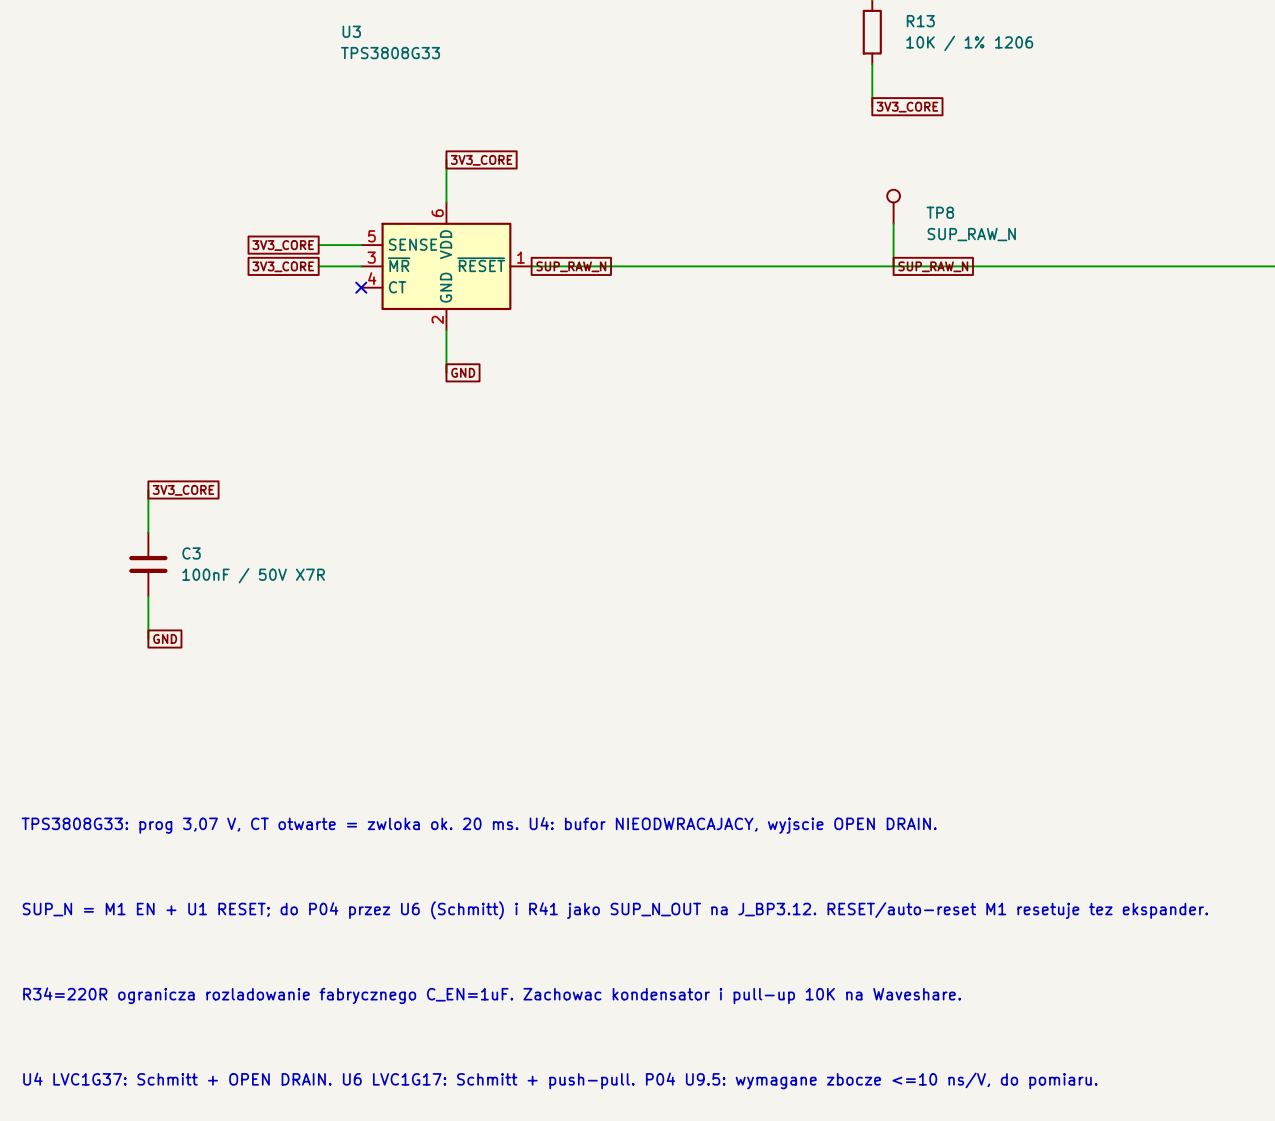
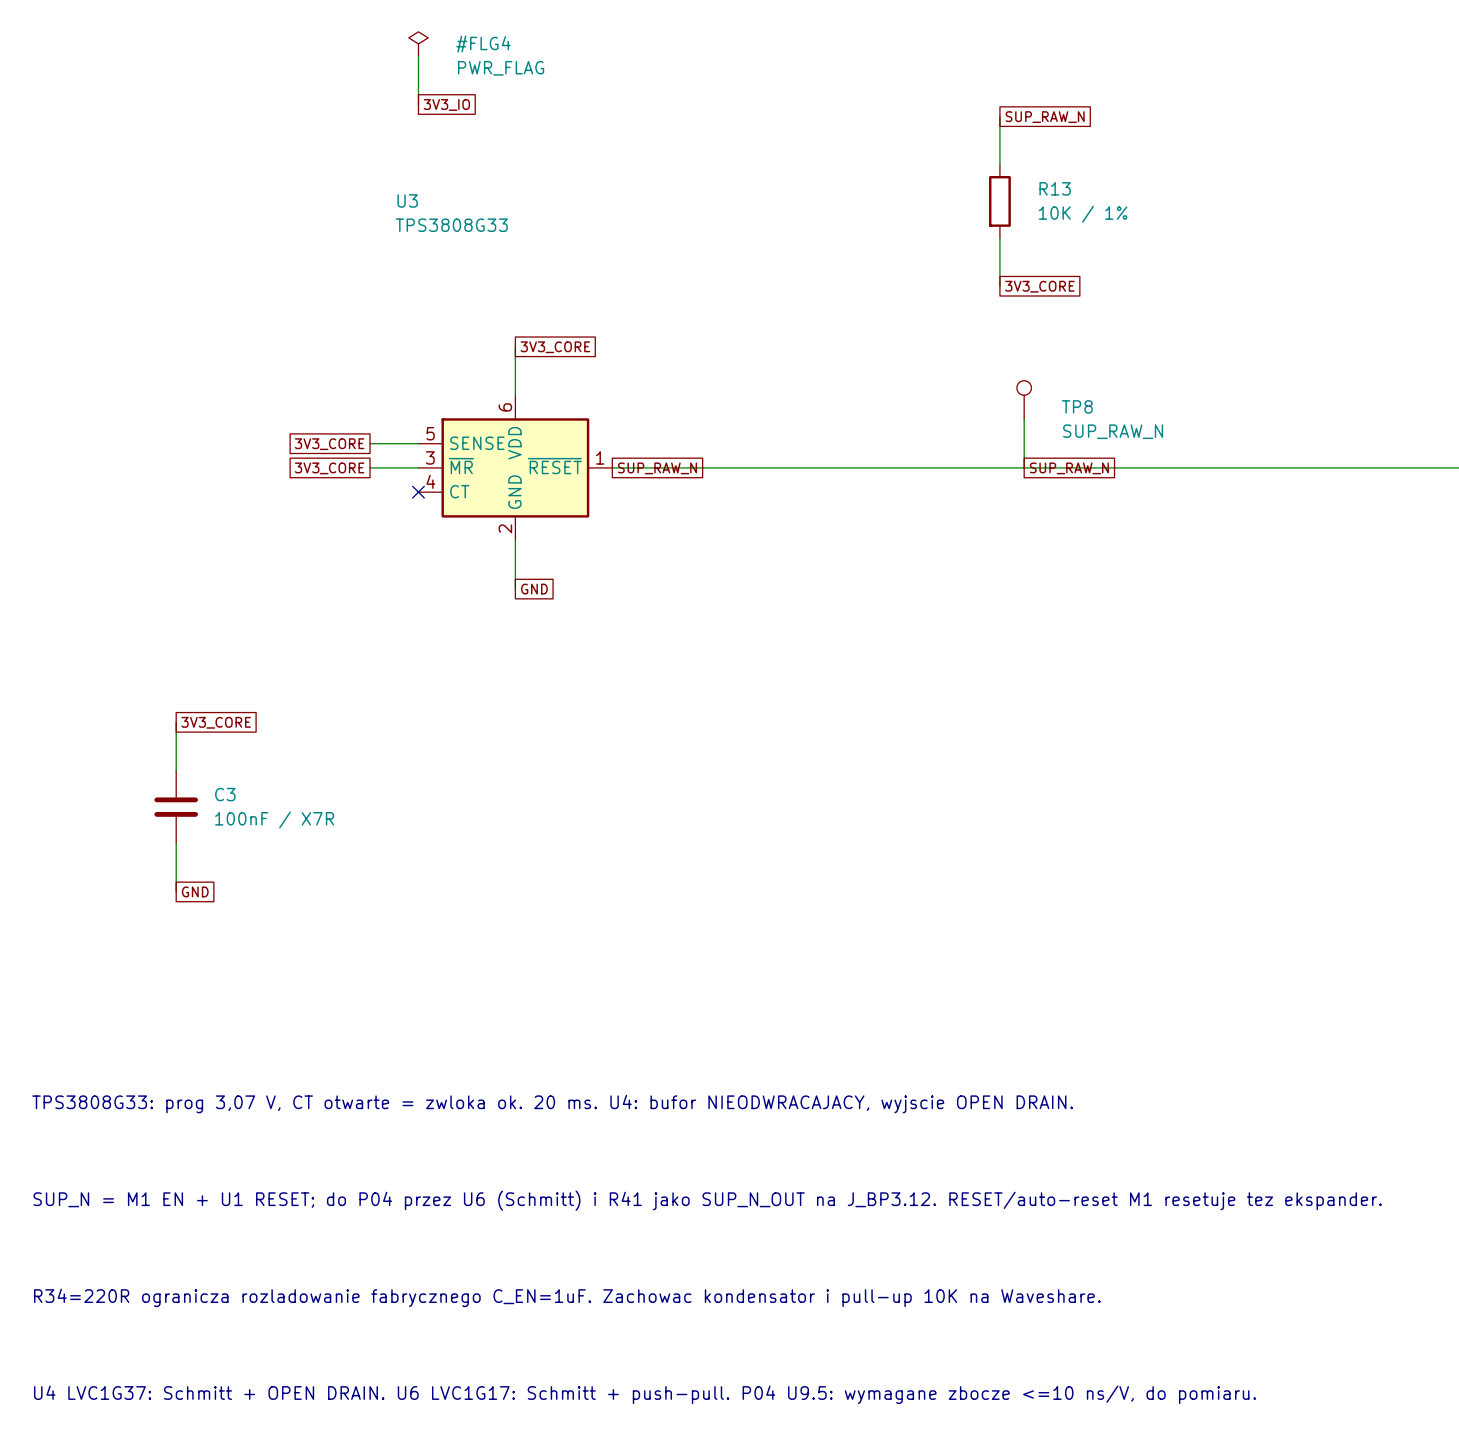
R13 value: 10K / 1% 1206 (969, 43) -> 10K / 1% (1083, 214)
C3 value: 100nF / 50V X7R (253, 575) -> 100nF / X7R (274, 819)

